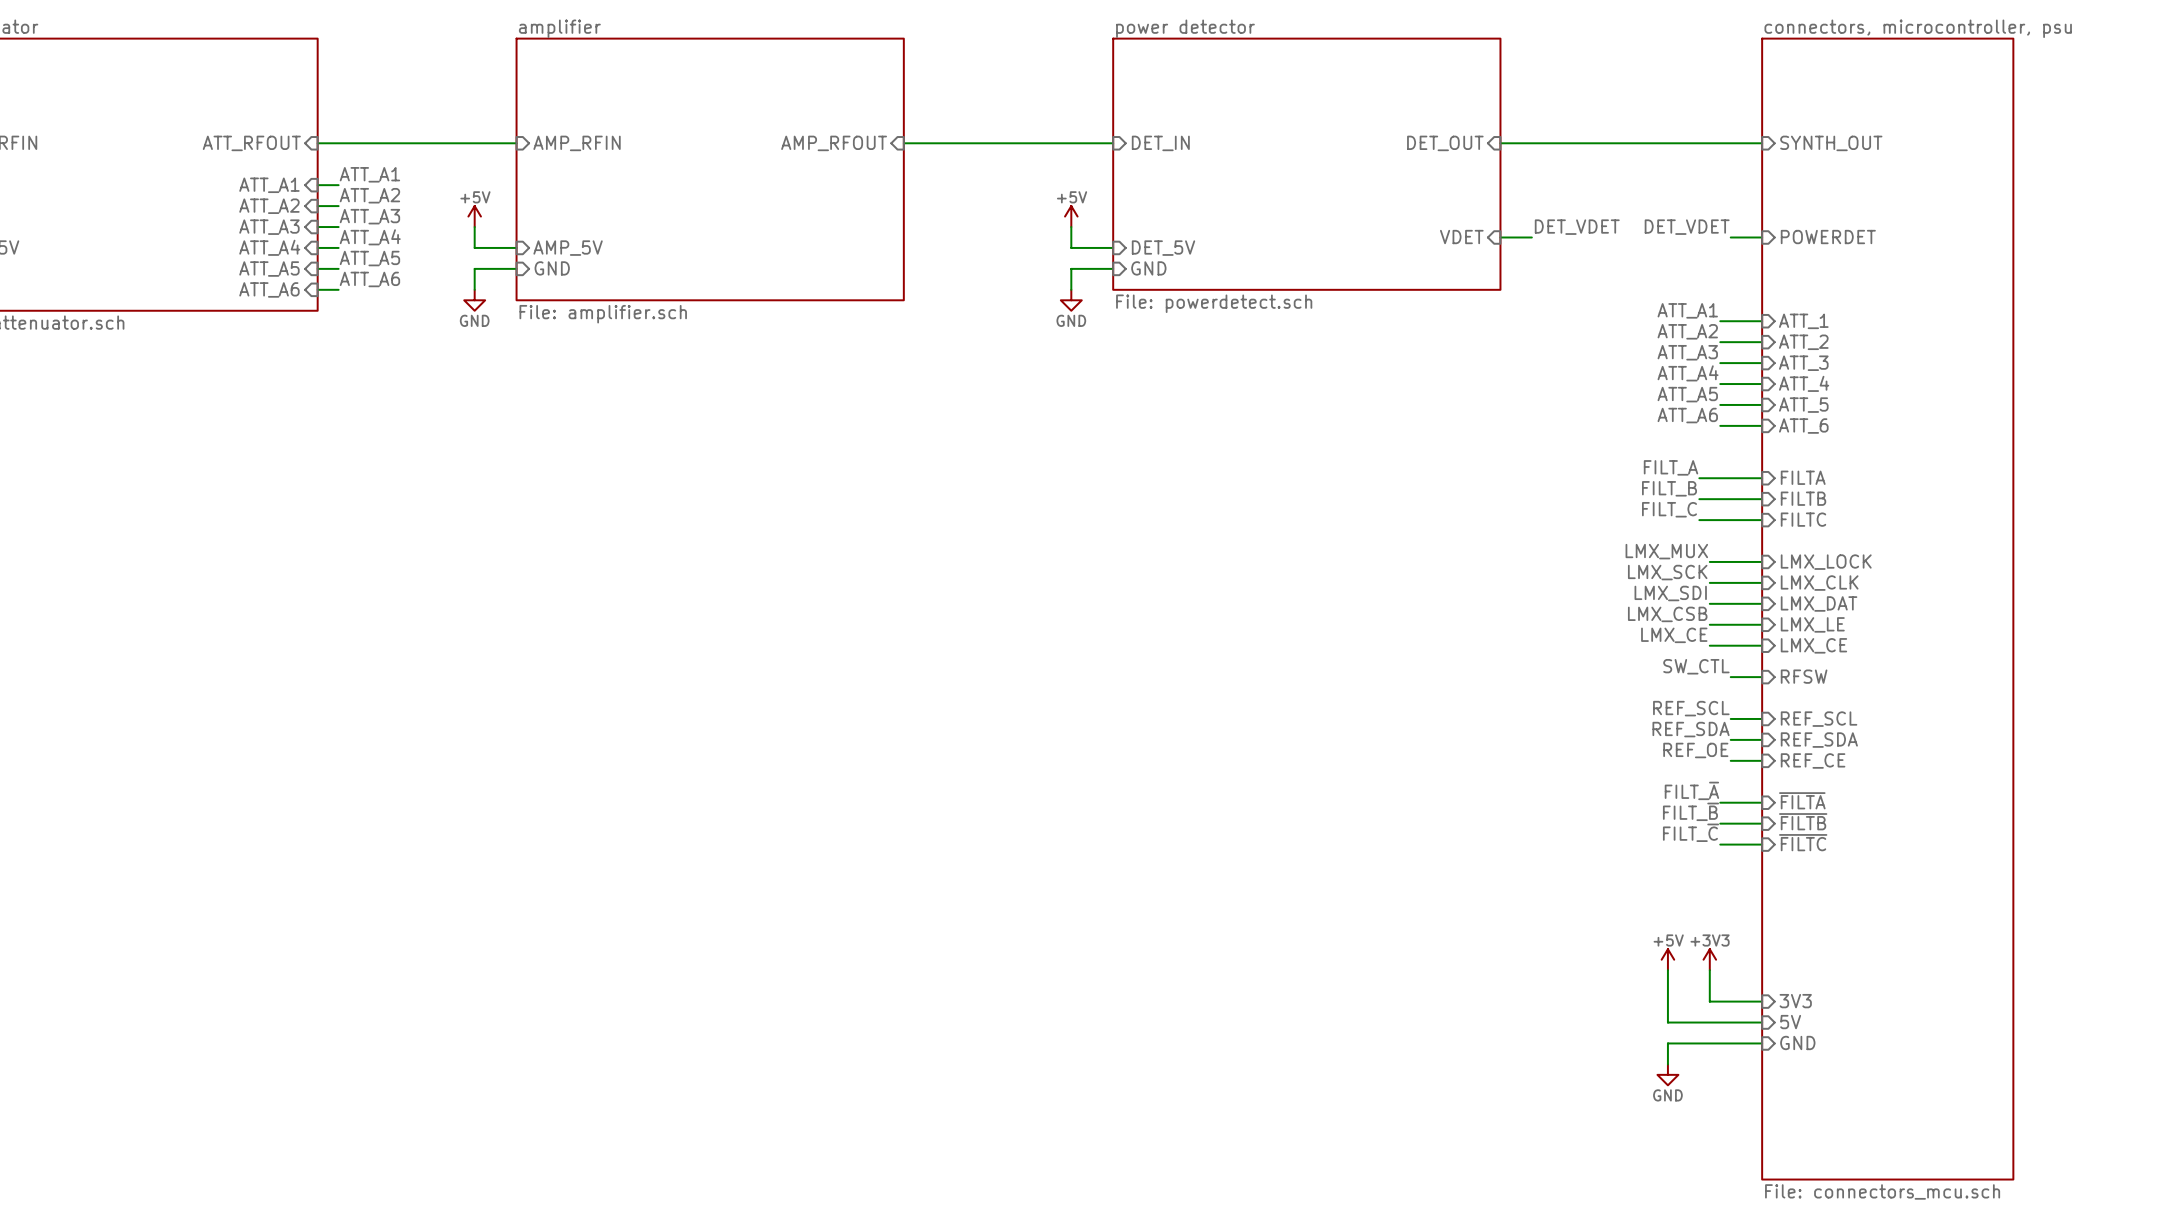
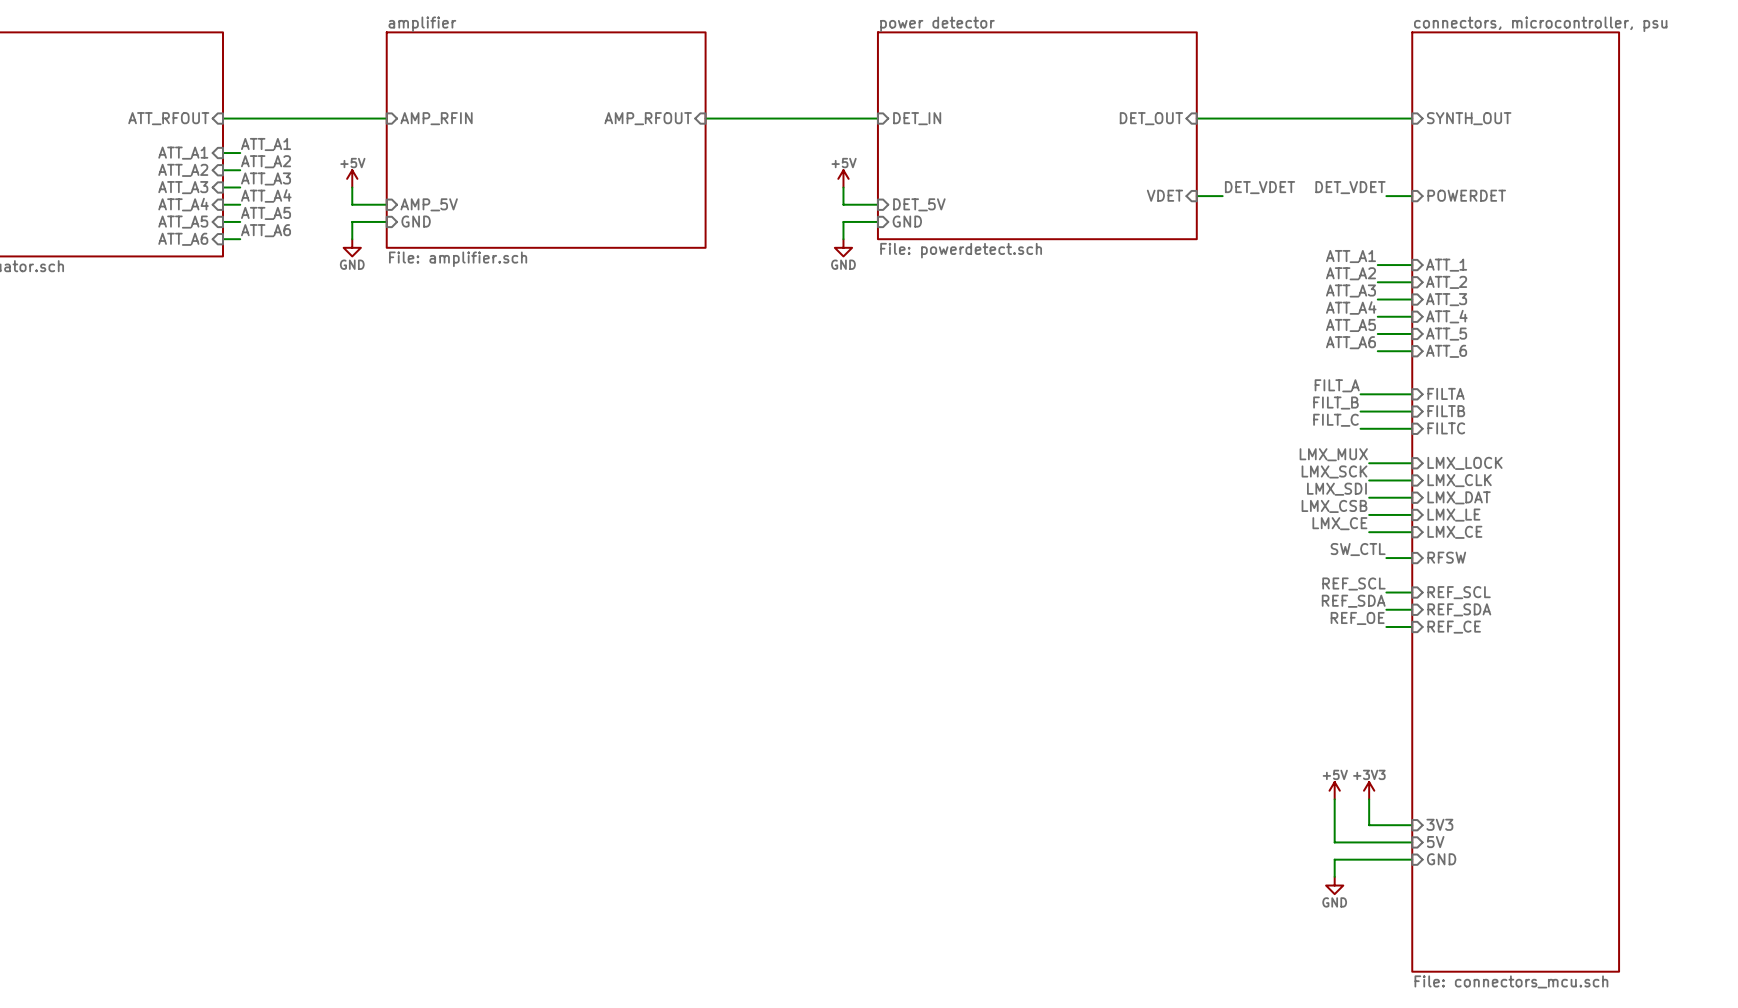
label: FILT_~{A} (1691, 790) -> none
sheet pin: ~{FILTA} (1802, 800) -> none
wire: (1720, 802) (1762, 802) -> none
label: FILT_~{B} (1691, 811) -> none
sheet pin: ~{FILTB} (1803, 821) -> none
wire: (1720, 823) (1762, 823) -> none
label: FILT_~{C} (1691, 832) -> none
sheet pin: ~{FILTC} (1803, 842) -> none
wire: (1720, 844) (1762, 844) -> none

